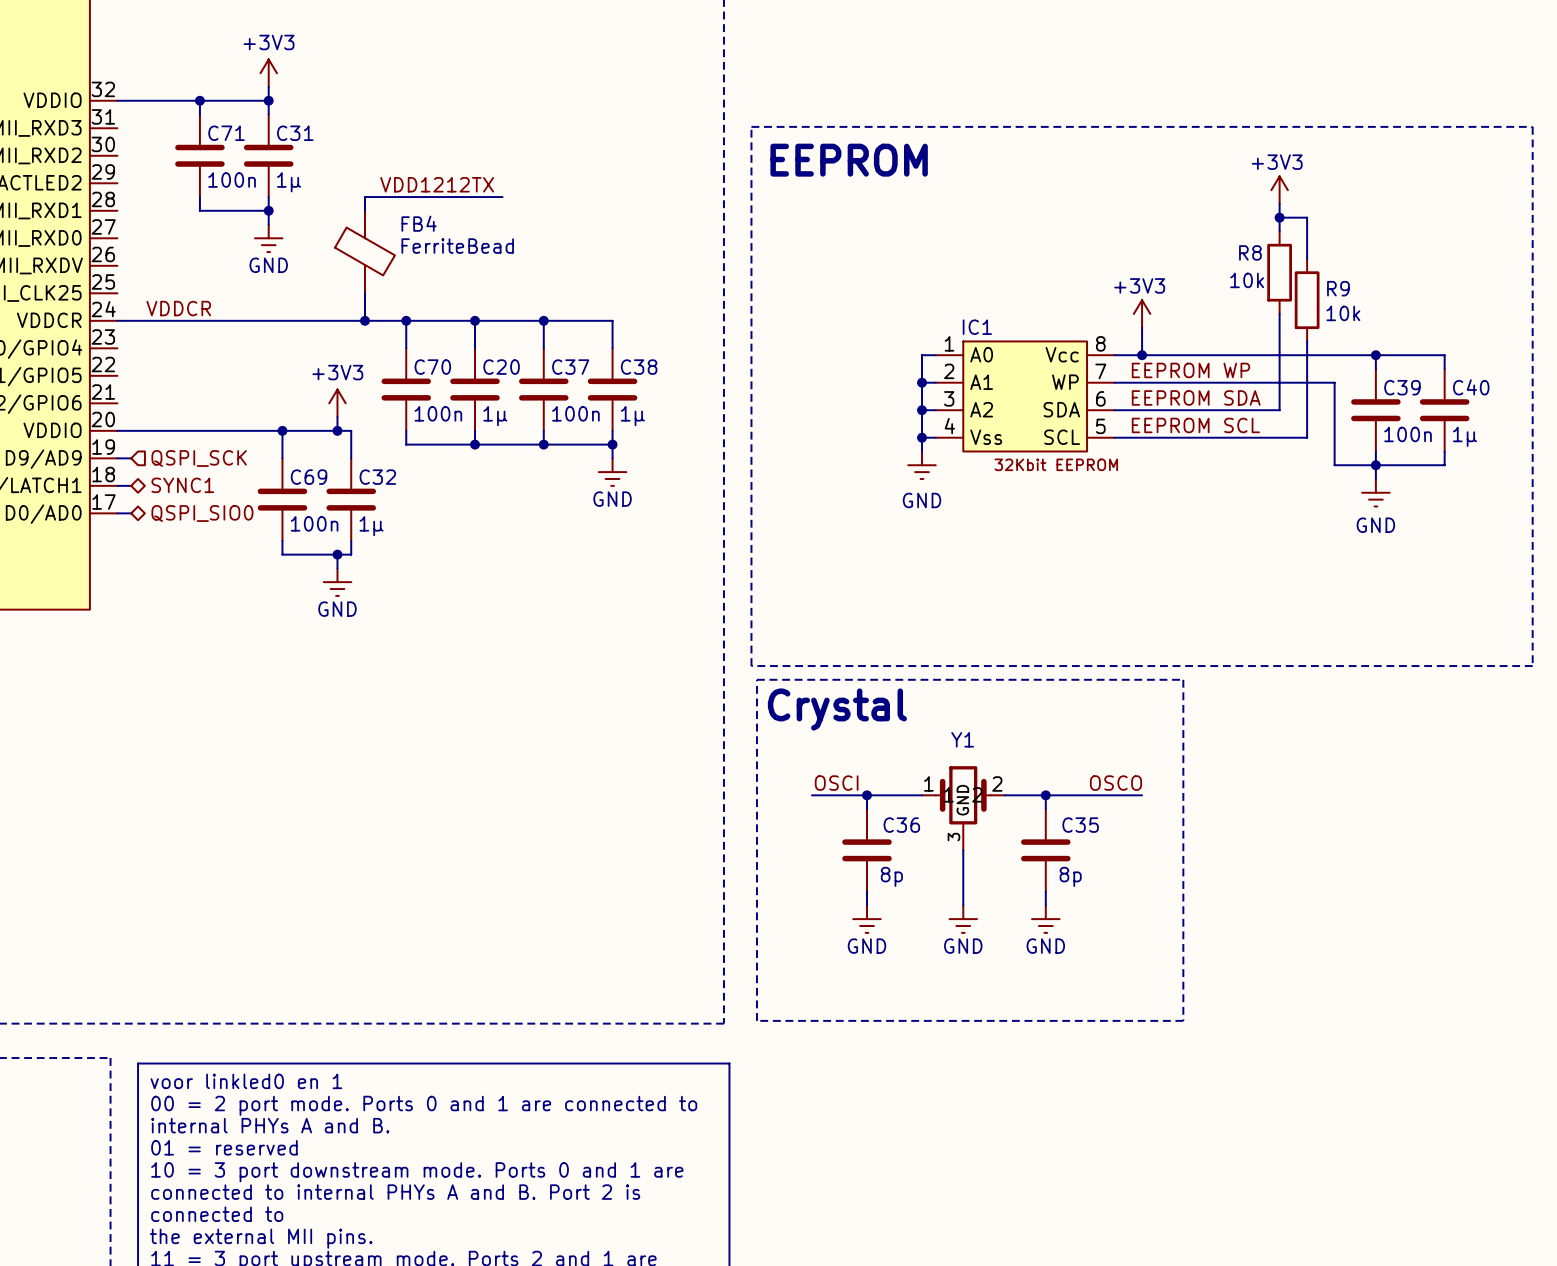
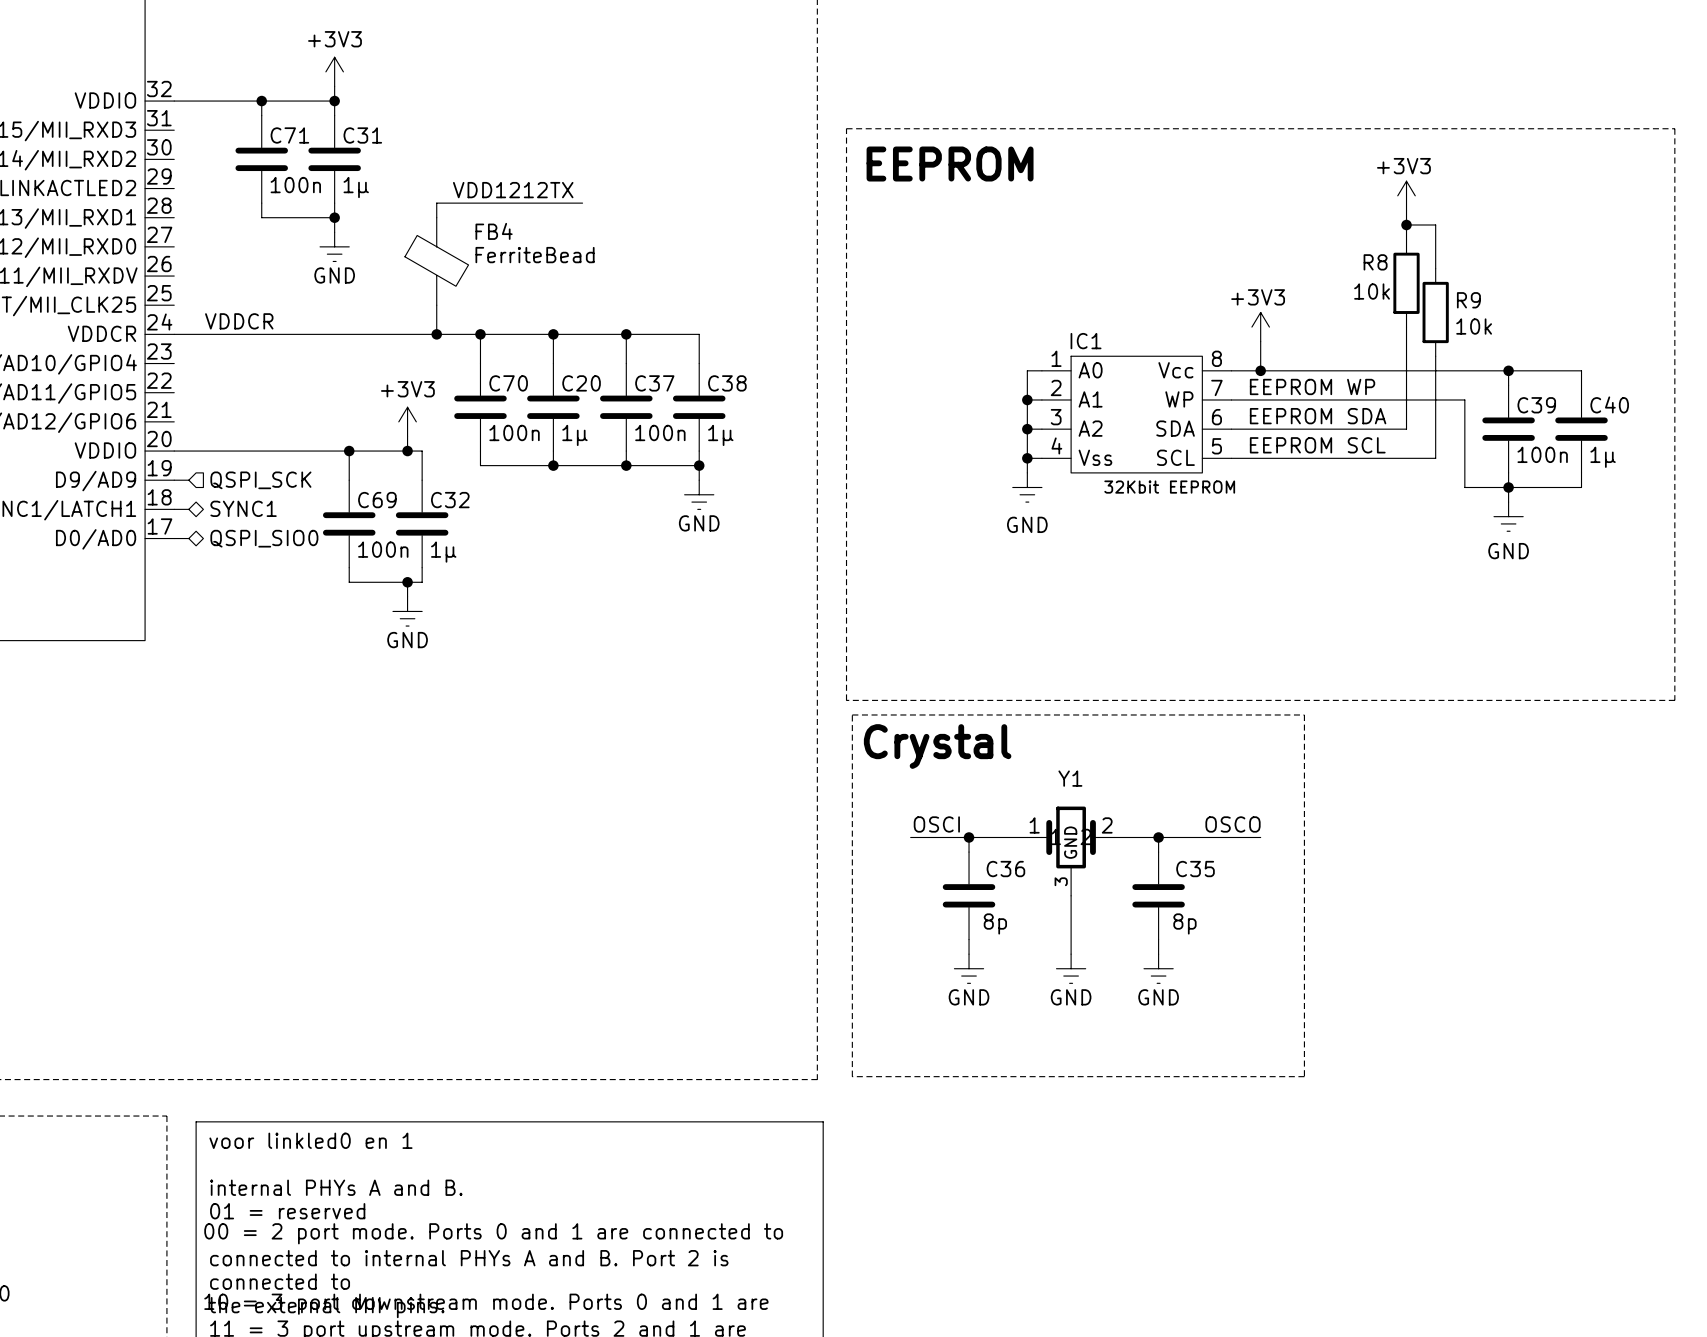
text position: 00 = 2 port mode. Ports 0 and 1 are connected to (424, 1105) -> 00 = 2 port mode. Ports 0 and 1 are connected to (493, 1233)
text position: 10 = 3 port downstream mode. Ports 0 and 1 are (417, 1172) -> 10 = 3 port downstream mode. Ports 0 and 1 are (486, 1304)

